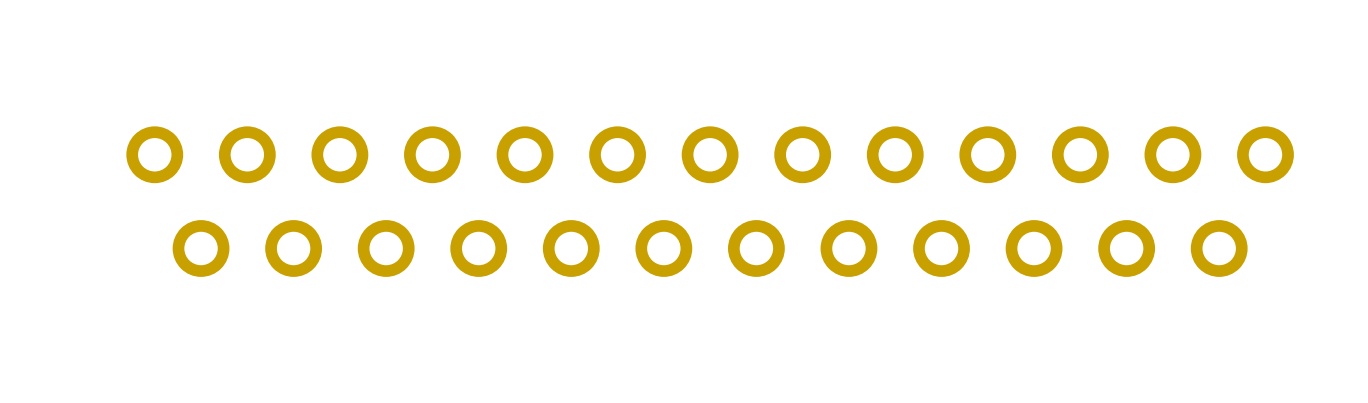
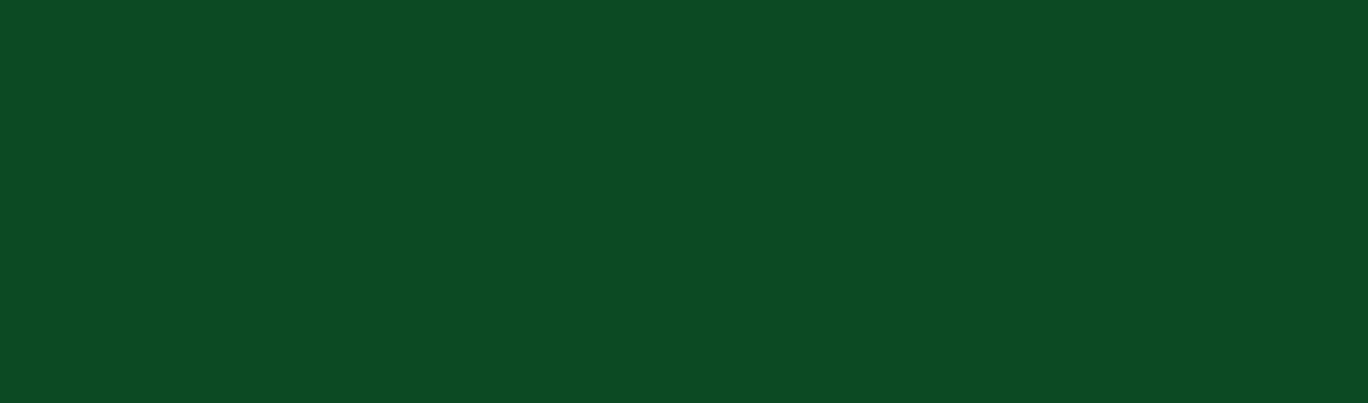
part: (710, 201) -> none

